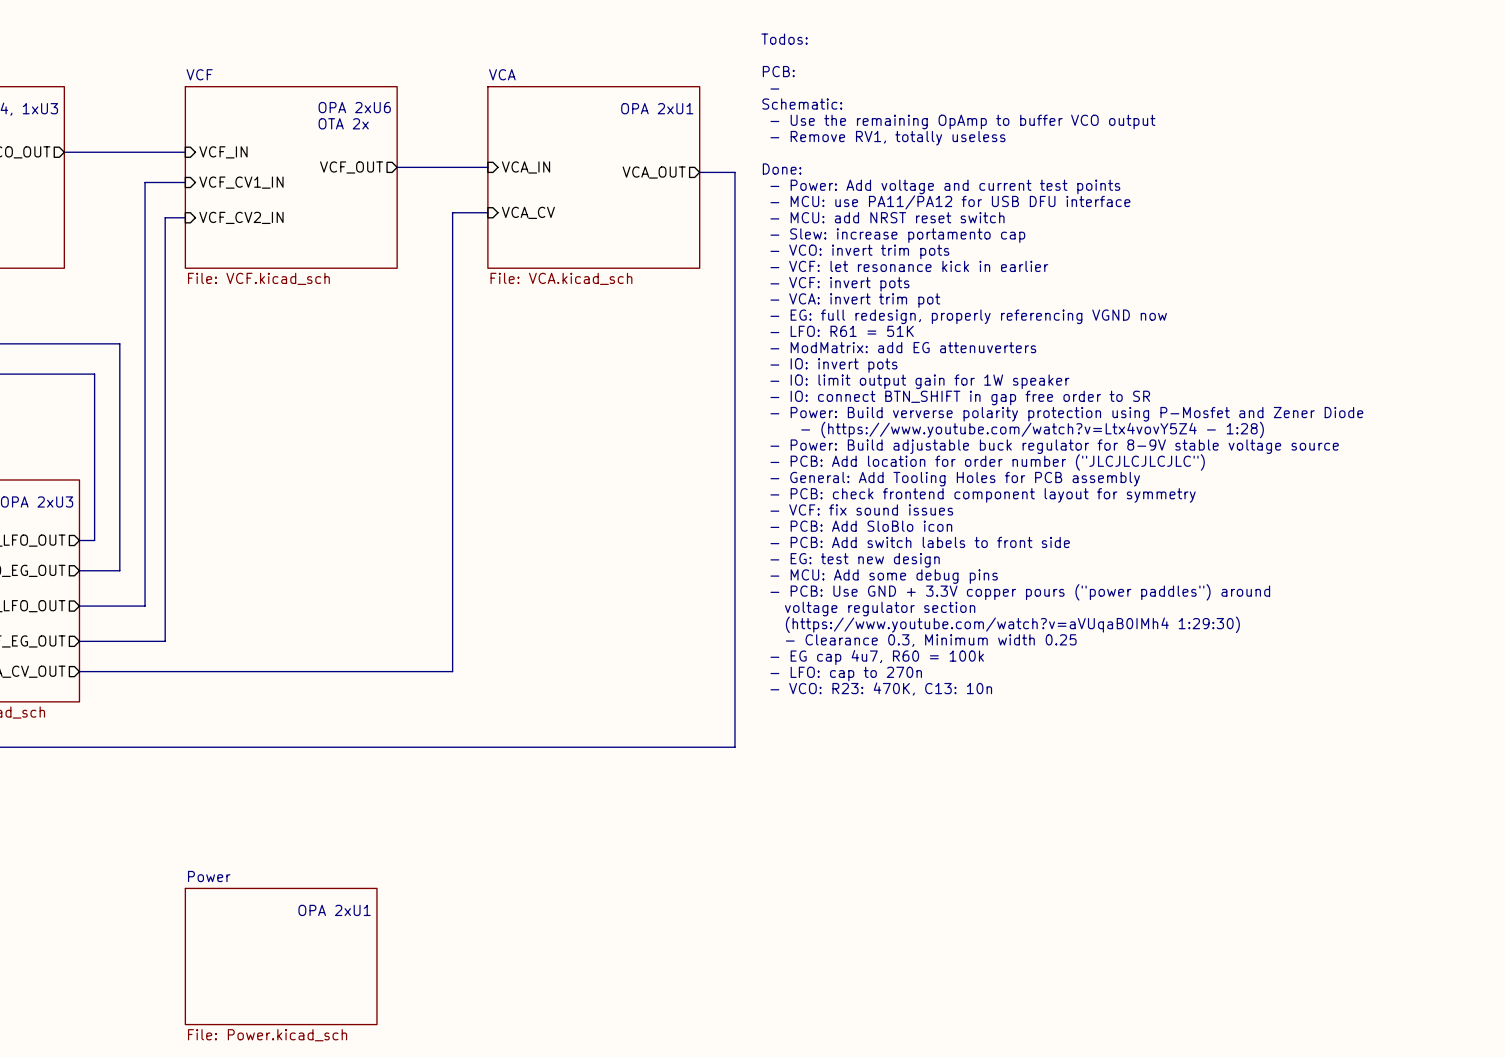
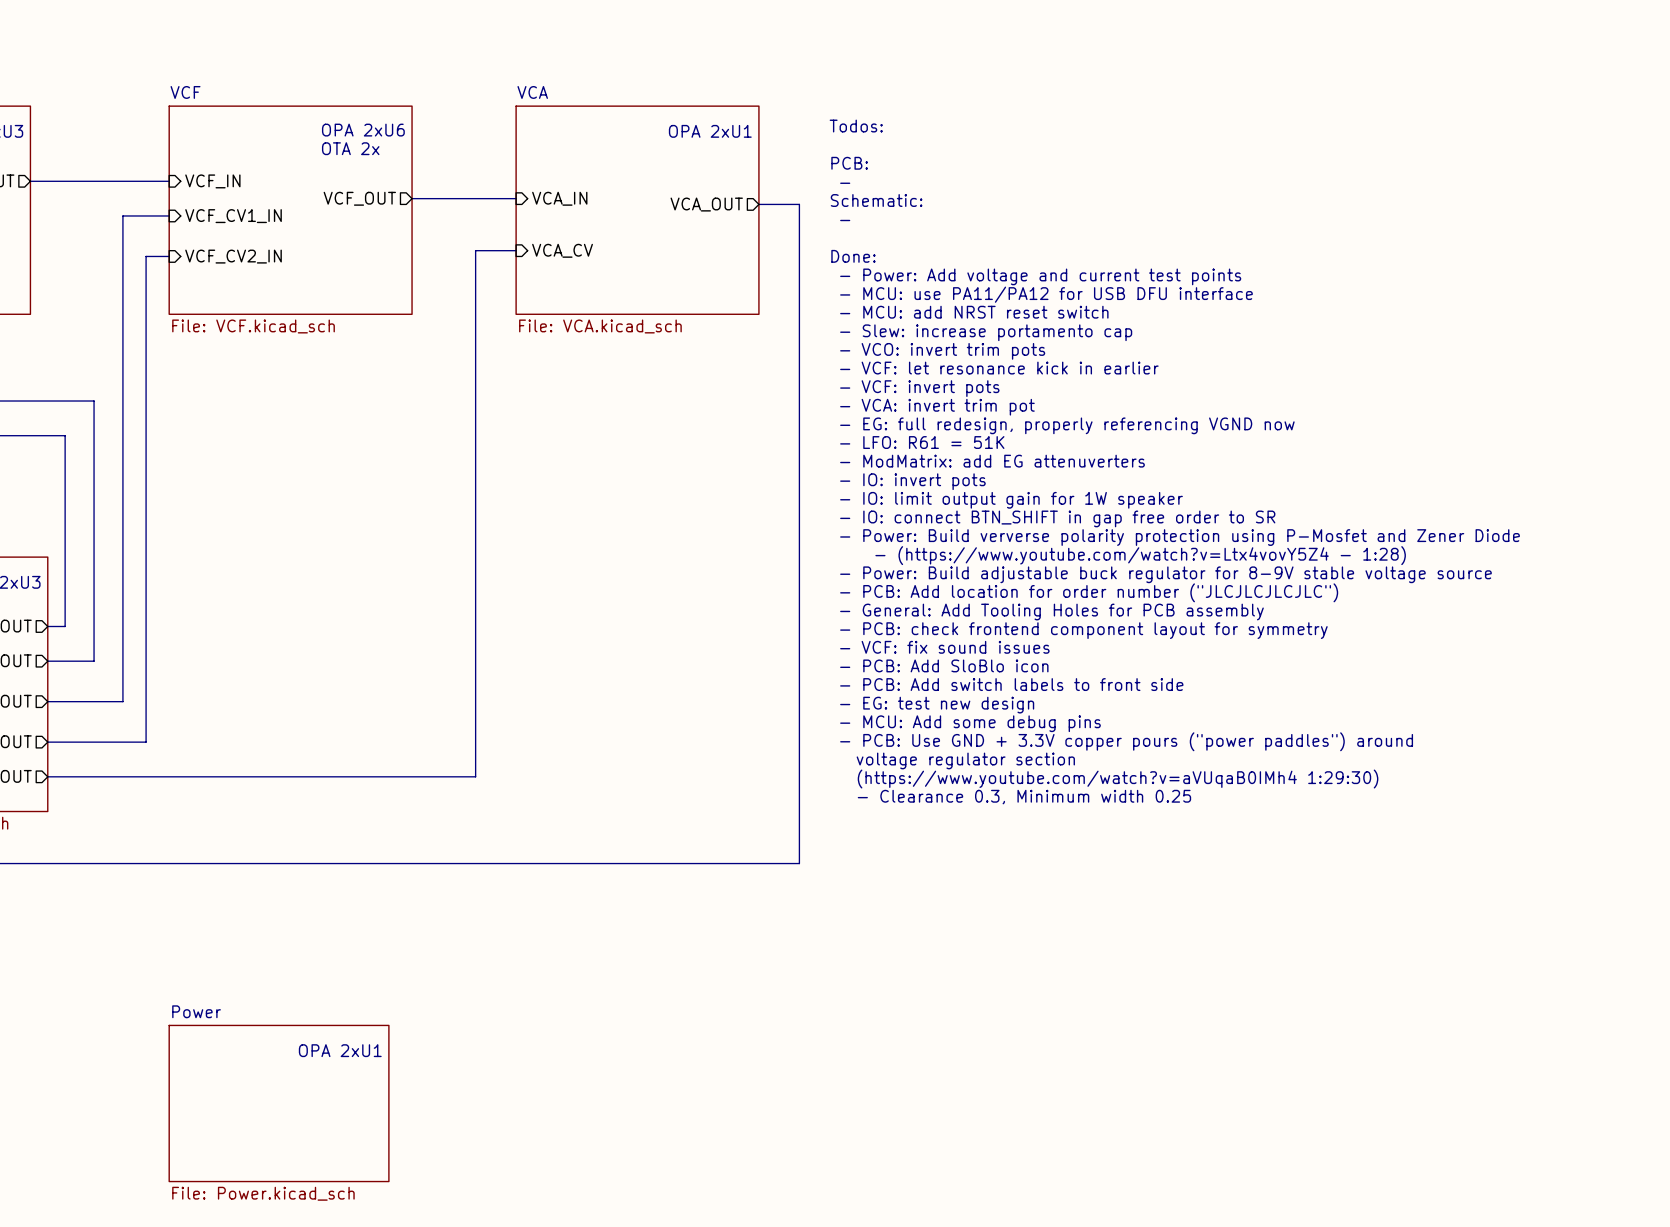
text: Todos: (784, 39) -> none
text: PCB: (778, 71) -> none
text position: - (774, 89) -> - (845, 183)
text: Schematic: (802, 104) -> Todos: (856, 126)
text: - Use the remaining OpAmp to buffer VCO output (962, 121) -> none
text: - Remove RV1, totally useless (888, 138) -> PCB: (849, 163)
text: Done: (782, 168) -> Schematic: (876, 200)
text: - Power: Add voltage and current test points (945, 186) -> - (845, 220)
text: - MCU: use PA11/PA12 for USB DFU interface (950, 202) -> none
text: - MCU: add NRST reset switch (887, 217) -> Done: (853, 256)
text: - Slew: increase portamento cap (897, 235) -> - Power: Add voltage and current test points (1040, 276)
text: - VCO: invert trim pots (859, 251) -> - MCU: use PA11/PA12 for USB DFU interface (1046, 294)
text: - VCF: let resonance kick in earlier (909, 266) -> - MCU: add NRST reset switch (974, 312)
text: - VCF: invert pots (839, 284) -> - Slew: increase portamento cap (986, 332)
text: - VCA: invert trim pot (855, 300) -> - VCO: invert trim pots (942, 351)
text: - EG: full redesign, properly referencing VGND now (968, 316) -> - VCF: let resonance kick in earlier (999, 368)
text: - LFO: R61 = 51K (842, 331) -> - VCF: invert pots (919, 388)
text: - ModMatrix: add EG attenuverters (903, 347) -> - VCA: invert trim pot (937, 407)
text: - IO: invert pots (833, 365) -> - EG: full redesign, properly referencing VGND now (1067, 425)
text: - IO: limit output gain for 1W speaker (919, 381) -> - LFO: R61 = 51K (922, 442)
text: - IO: connect BTN_SHIFT in gap free order to SR (960, 397) -> - ModMatrix: add EG attenuverters (992, 461)
text: - Power: Build ververse polarity protection using P-Mosfet and Zener Diode (1066, 414) -> - IO: invert pots (912, 481)
text: - (https://www.youtube.com/watch?v=Ltx4vovY5Z4 - 1:28) (1032, 429) -> - IO: limit output gain for 1W speaker (1011, 500)
text: - Power: Build adjustable buck regulator for 8-9V stable voltage source (1054, 446) -> - IO: connect BTN_SHIFT in gap free order to SR (1057, 518)
text: - PCB: Add location for order number ("JLCJLCJLCJLC") (987, 462) -> - Power: Build ververse polarity protection using P-Mosfet and Zener Diode (1179, 537)
text: - General: Add Tooling Holes for PCB assembly (955, 479) -> - (https://www.youtube.com/watch?v=Ltx4vovY5Z4 - 1:28) (1140, 555)
text: - PCB: check frontend component layout for symmetry (983, 495) -> - Power: Build adjustable buck regulator for 8-9V stable voltage source (1165, 574)
text: - VCF: fix sound issues (861, 509) -> - PCB: Add location for order number ("JLCJLCJLCJLC") (1089, 592)
text: - PCB: Add SloBlo icon (861, 526) -> - General: Add Tooling Holes for PCB assembly (1051, 612)
text: - PCB: Add switch labels to front side (920, 542) -> - PCB: check frontend component layout for symmetry (1083, 630)
text: - EG: test new design (855, 560) -> - VCF: fix sound issues (944, 647)
text: - MCU: Add some debug pins (884, 576) -> - PCB: Add SloBlo icon (944, 665)
text: - PCB: Use GND + 3.3V copper pours ("power paddles") around (1020, 592) -> - PCB: Add switch labels to front side (1011, 684)
text: voltage regulator section (880, 609) -> - EG: test new design (937, 705)
text: (https://www.youtube.com/watch?v=aVUqaB0IMh4 1:29:30) (1012, 624) -> - MCU: Add some debug pins (970, 723)
text: - Clearance 0.3, Minimum width 0.25 (931, 640) -> - PCB: Use GND + 3.3V copper pours ("power paddles") around (1126, 741)
text: - EG cap 4u7, R60 = 100k (877, 657) -> voltage regulator section (965, 760)
text: - LFO: cap to 270n (846, 674) -> (https://www.youtube.com/watch?v=aVUqaB0IMh4 1:29:30) (1118, 779)
text: - VCO: R23: 470K, C13: 10n (881, 689) -> - Clearance 0.3, Minimum width 0.25 (1024, 797)

